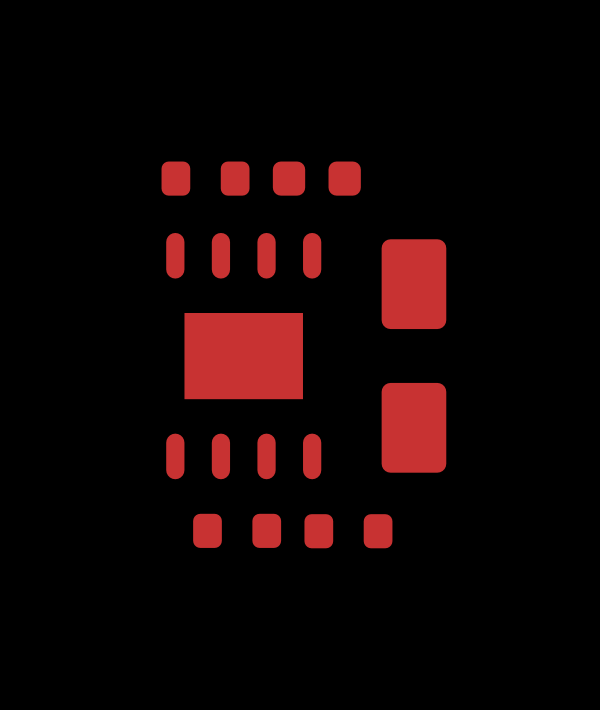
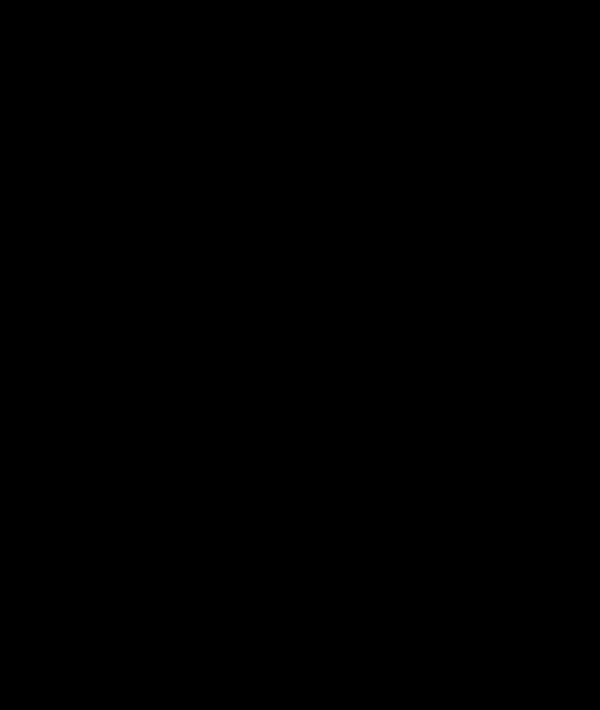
part: (205, 178) -> none
part: (316, 178) -> none
part: (413, 355) -> none
part: (243, 356) -> none
part: (237, 530) -> none
part: (348, 531) -> none

